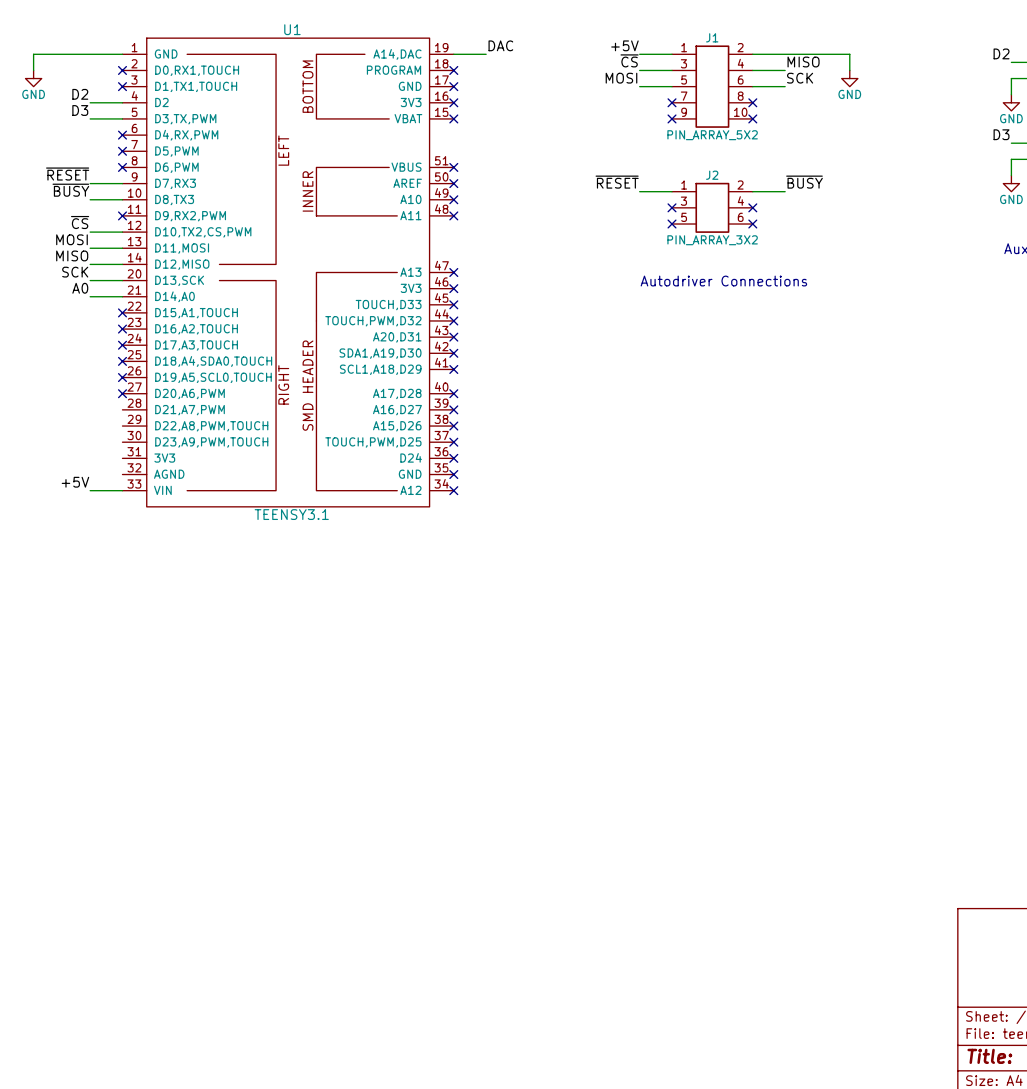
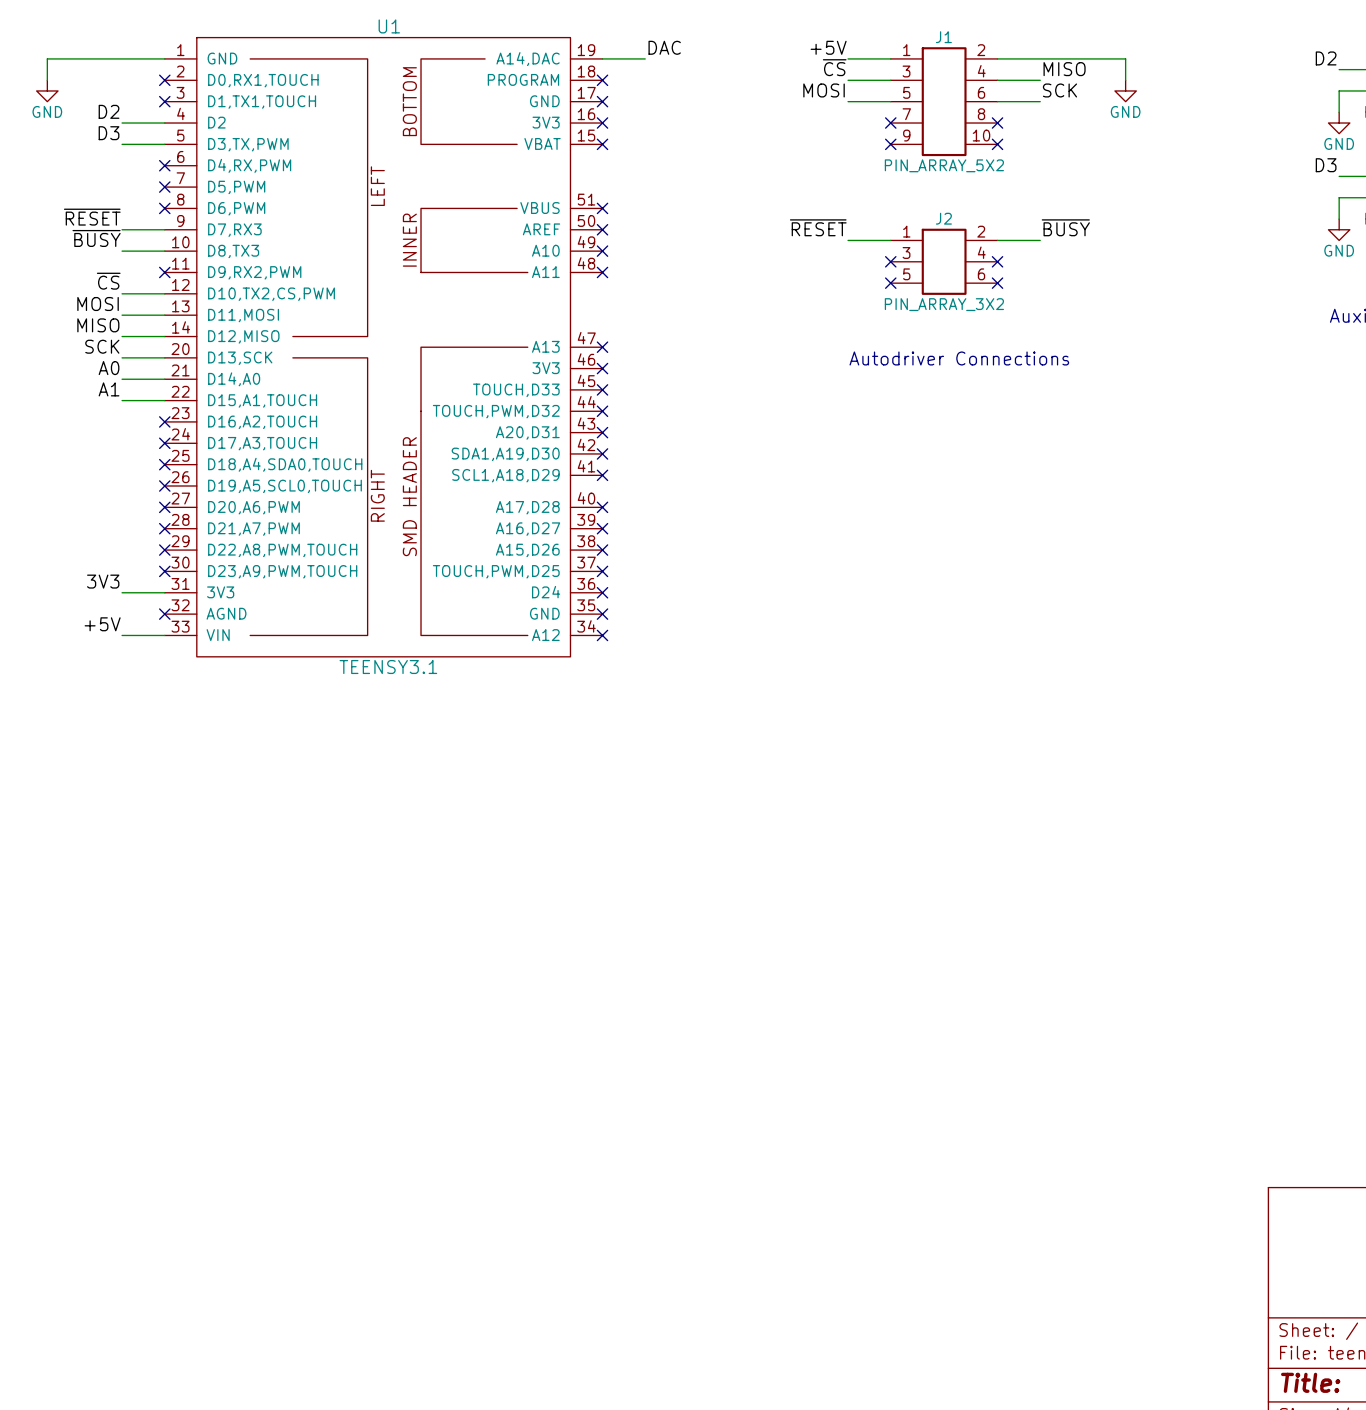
label: none -> A1 (109, 389)
wire: none -> (122, 400) (164, 400)
no-connect mark: (122, 312) -> none
no-connect mark: none -> (164, 528)
no-connect mark: none -> (164, 550)
no-connect mark: none -> (164, 571)
label: none -> 3V3 (103, 581)
wire: none -> (122, 592) (164, 592)
no-connect mark: none -> (164, 614)

